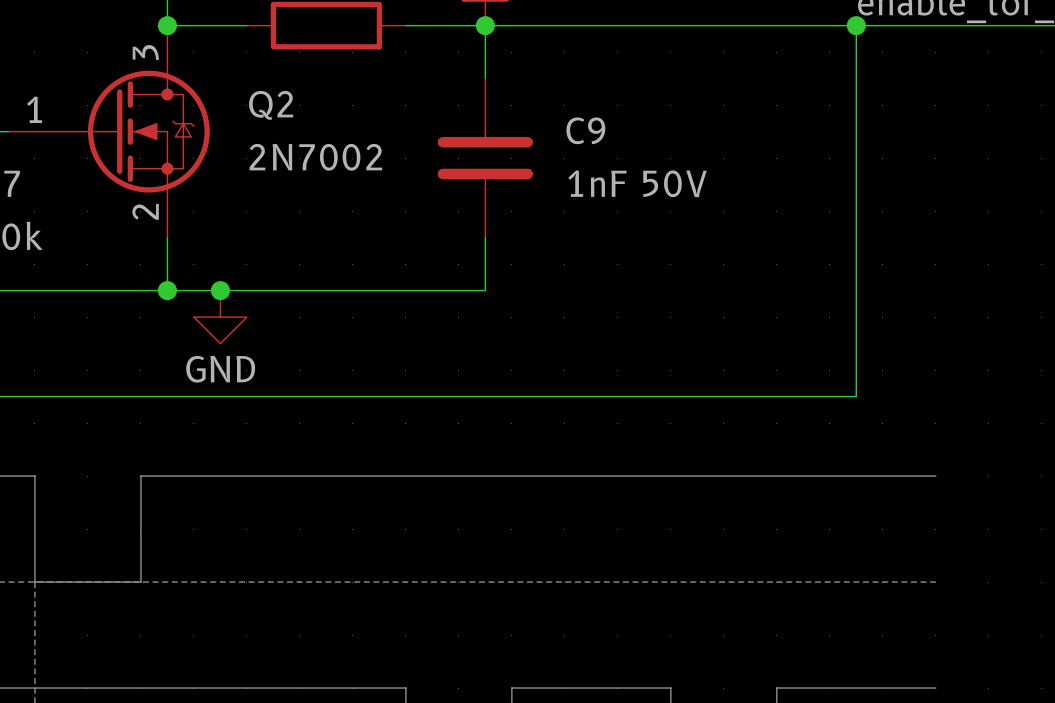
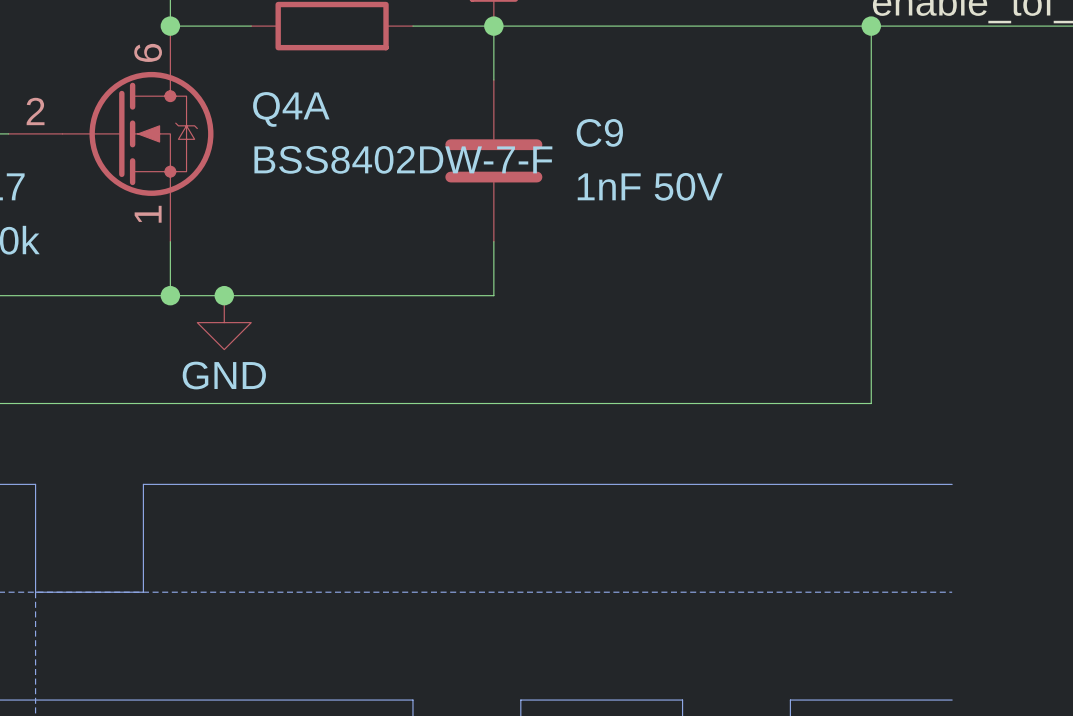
Q2 pin number: 3 (145, 52) -> 6 (148, 52)
Q2 name: Q2 (271, 105) -> Q4A (291, 109)
Q2 pin number: 1 (34, 109) -> 2 (35, 111)
Q2 value: 2N7002 (315, 157) -> BSS8402DW-7-F (403, 159)
Q2 pin number: 2 (145, 211) -> 1 (148, 214)

